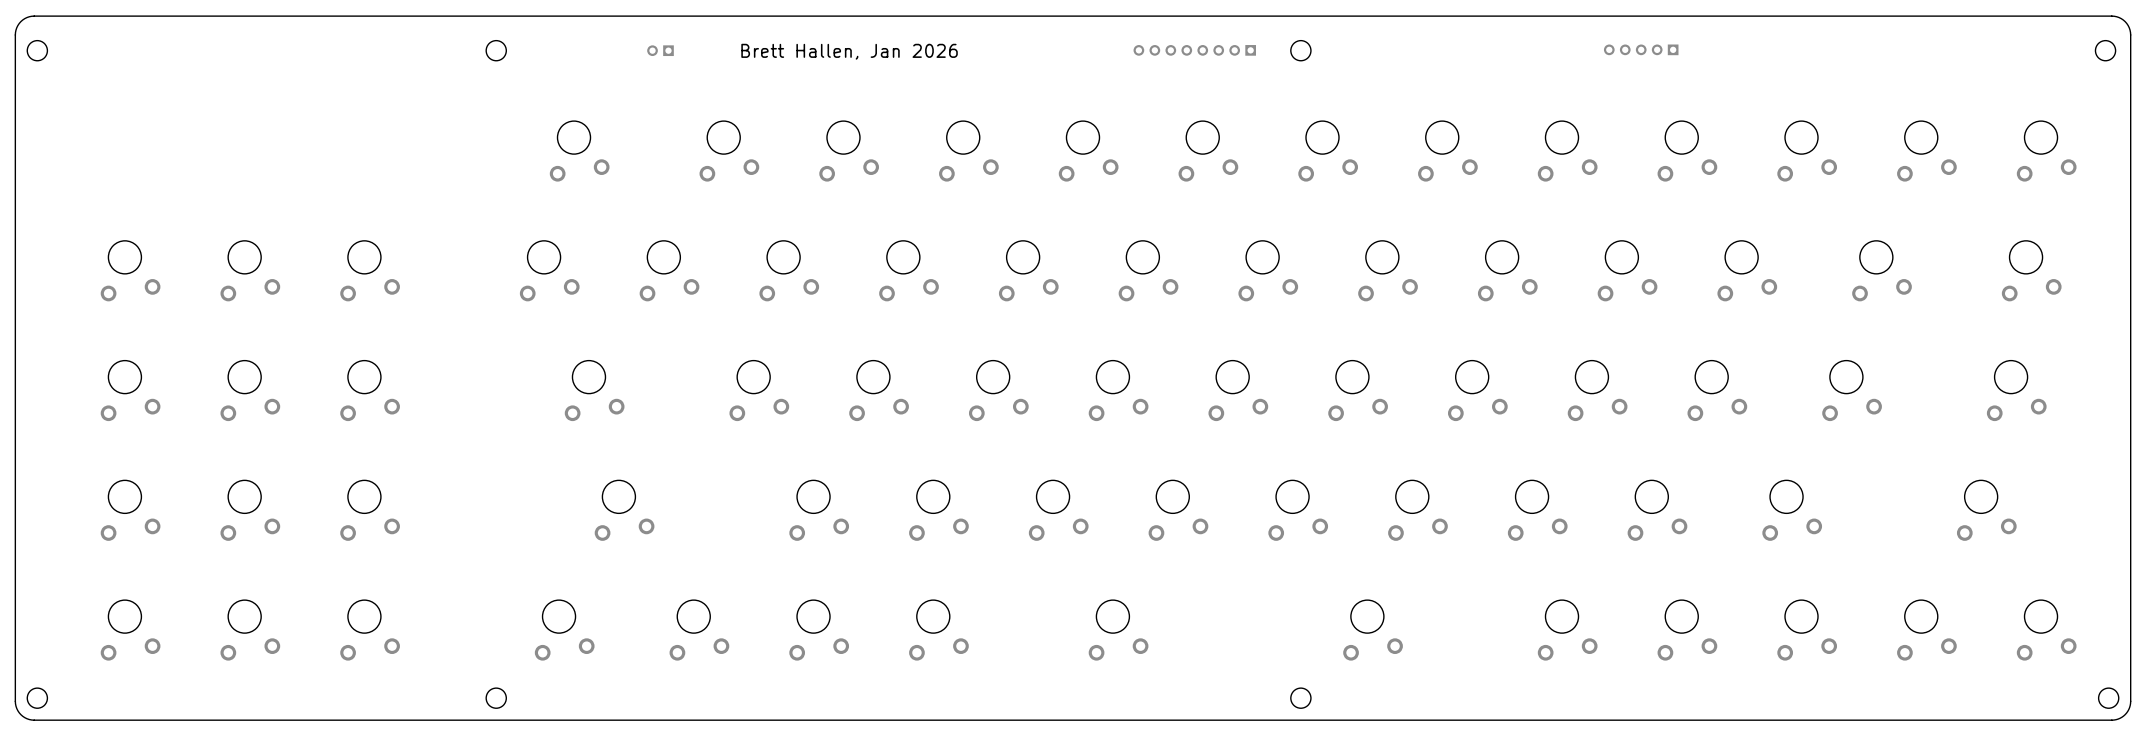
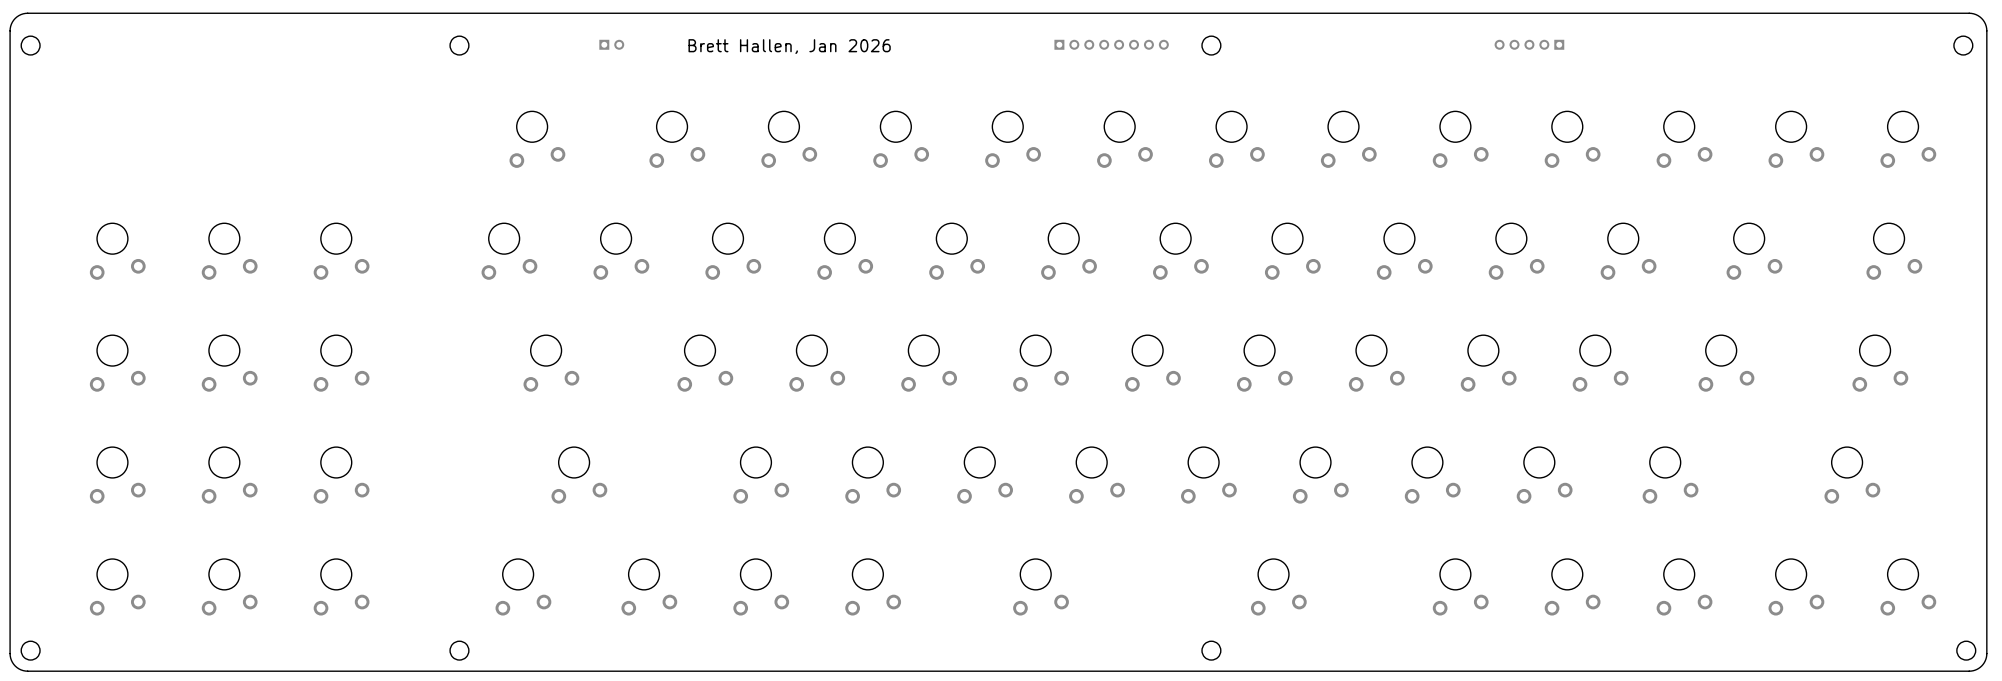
part rotation: 0° (660, 50) -> 180° (611, 44)
part rotation: 0° (1194, 50) -> 180° (1111, 44)

